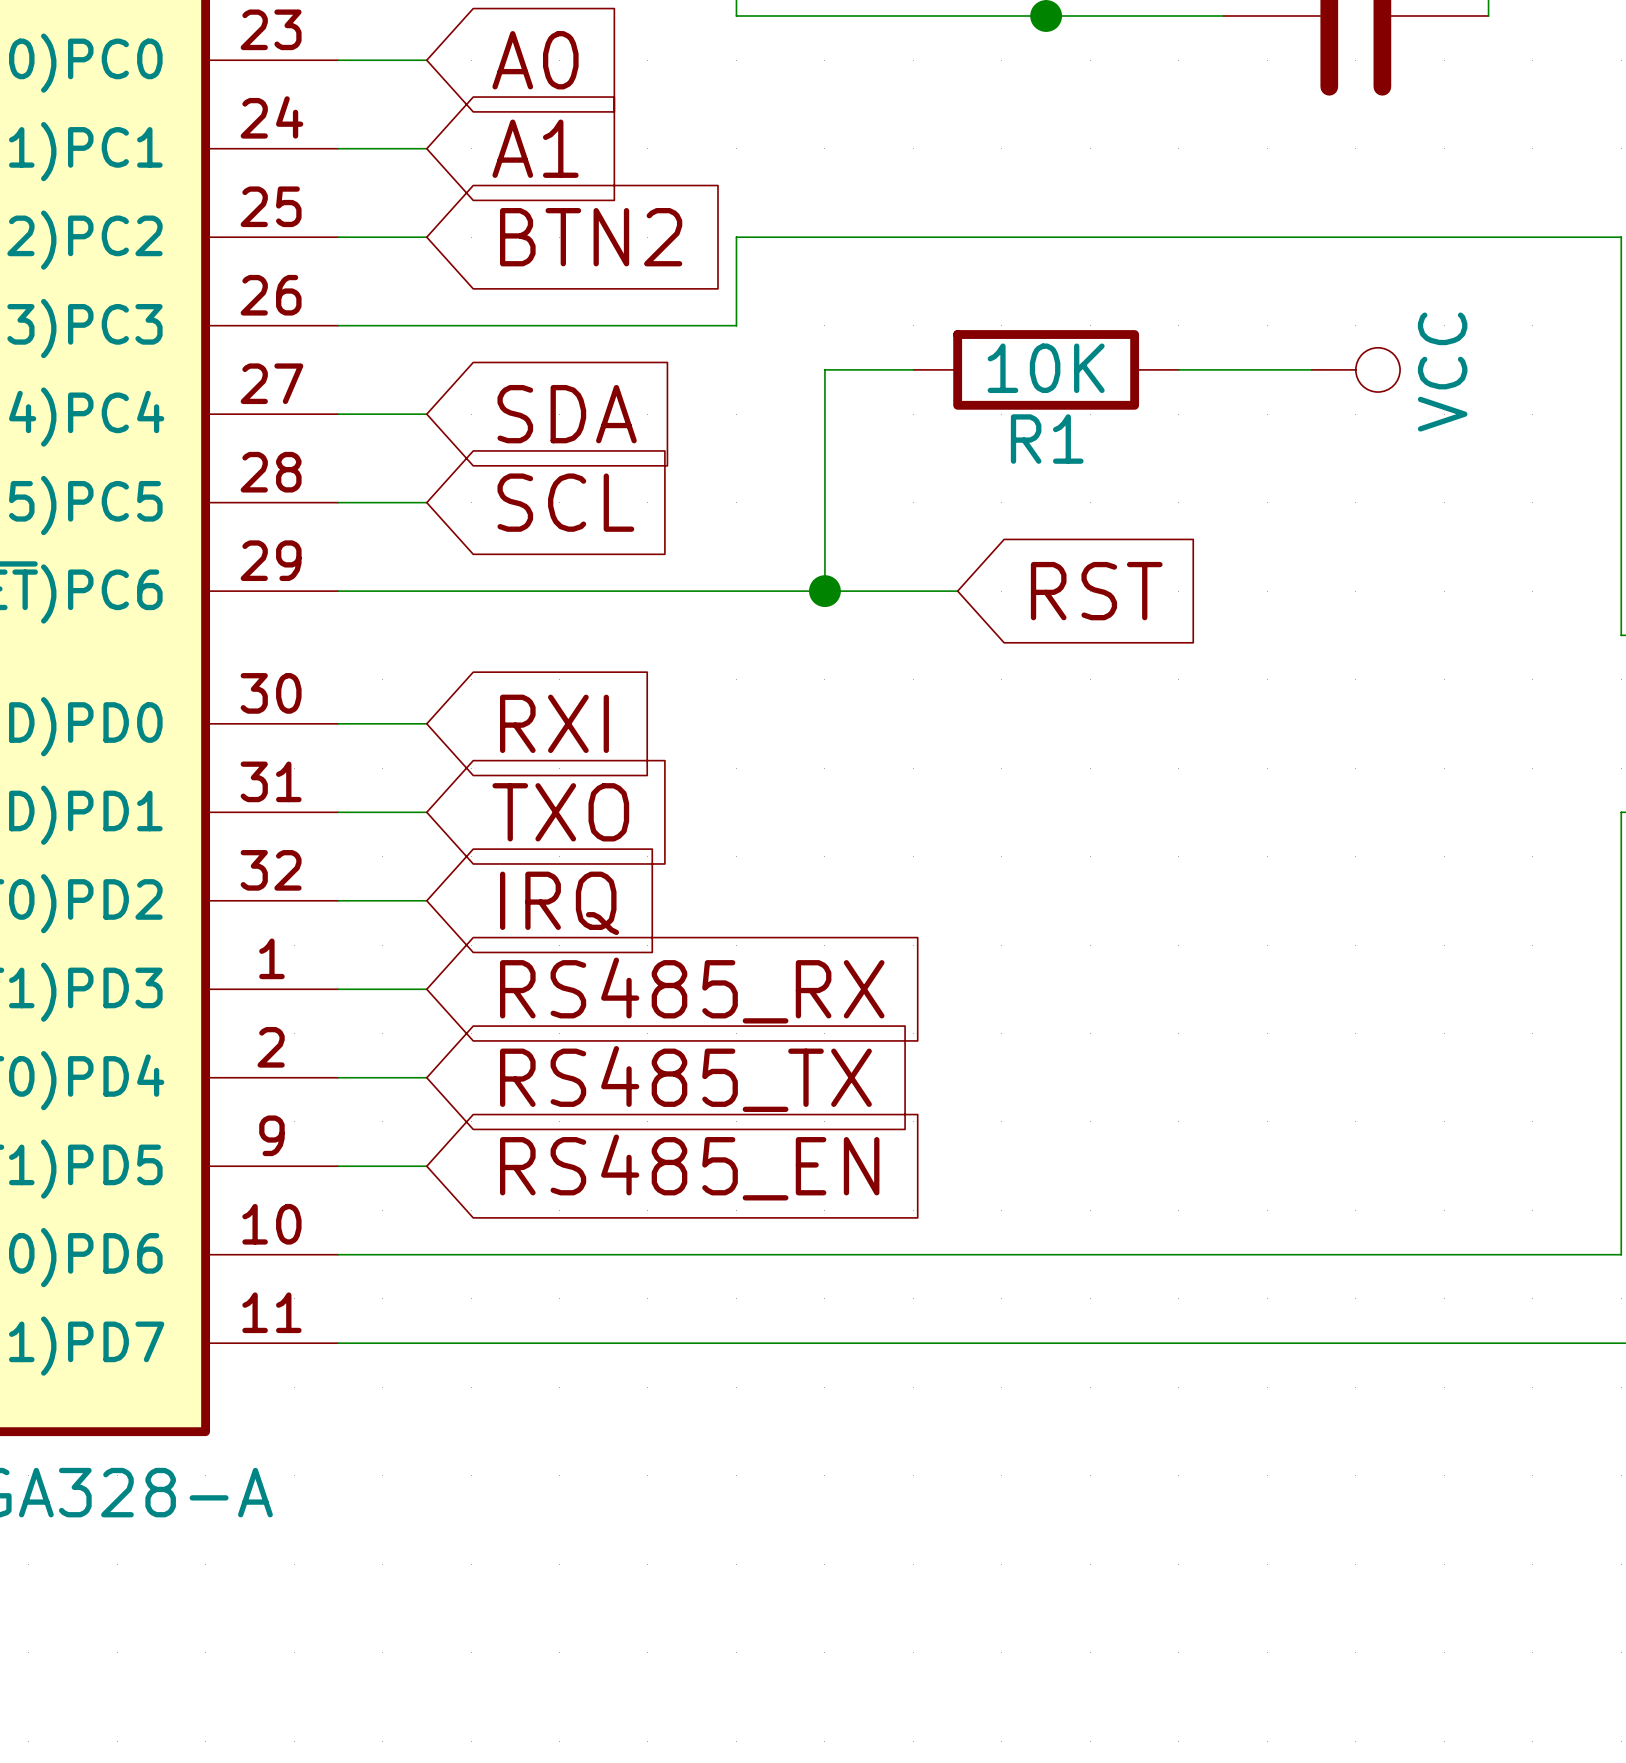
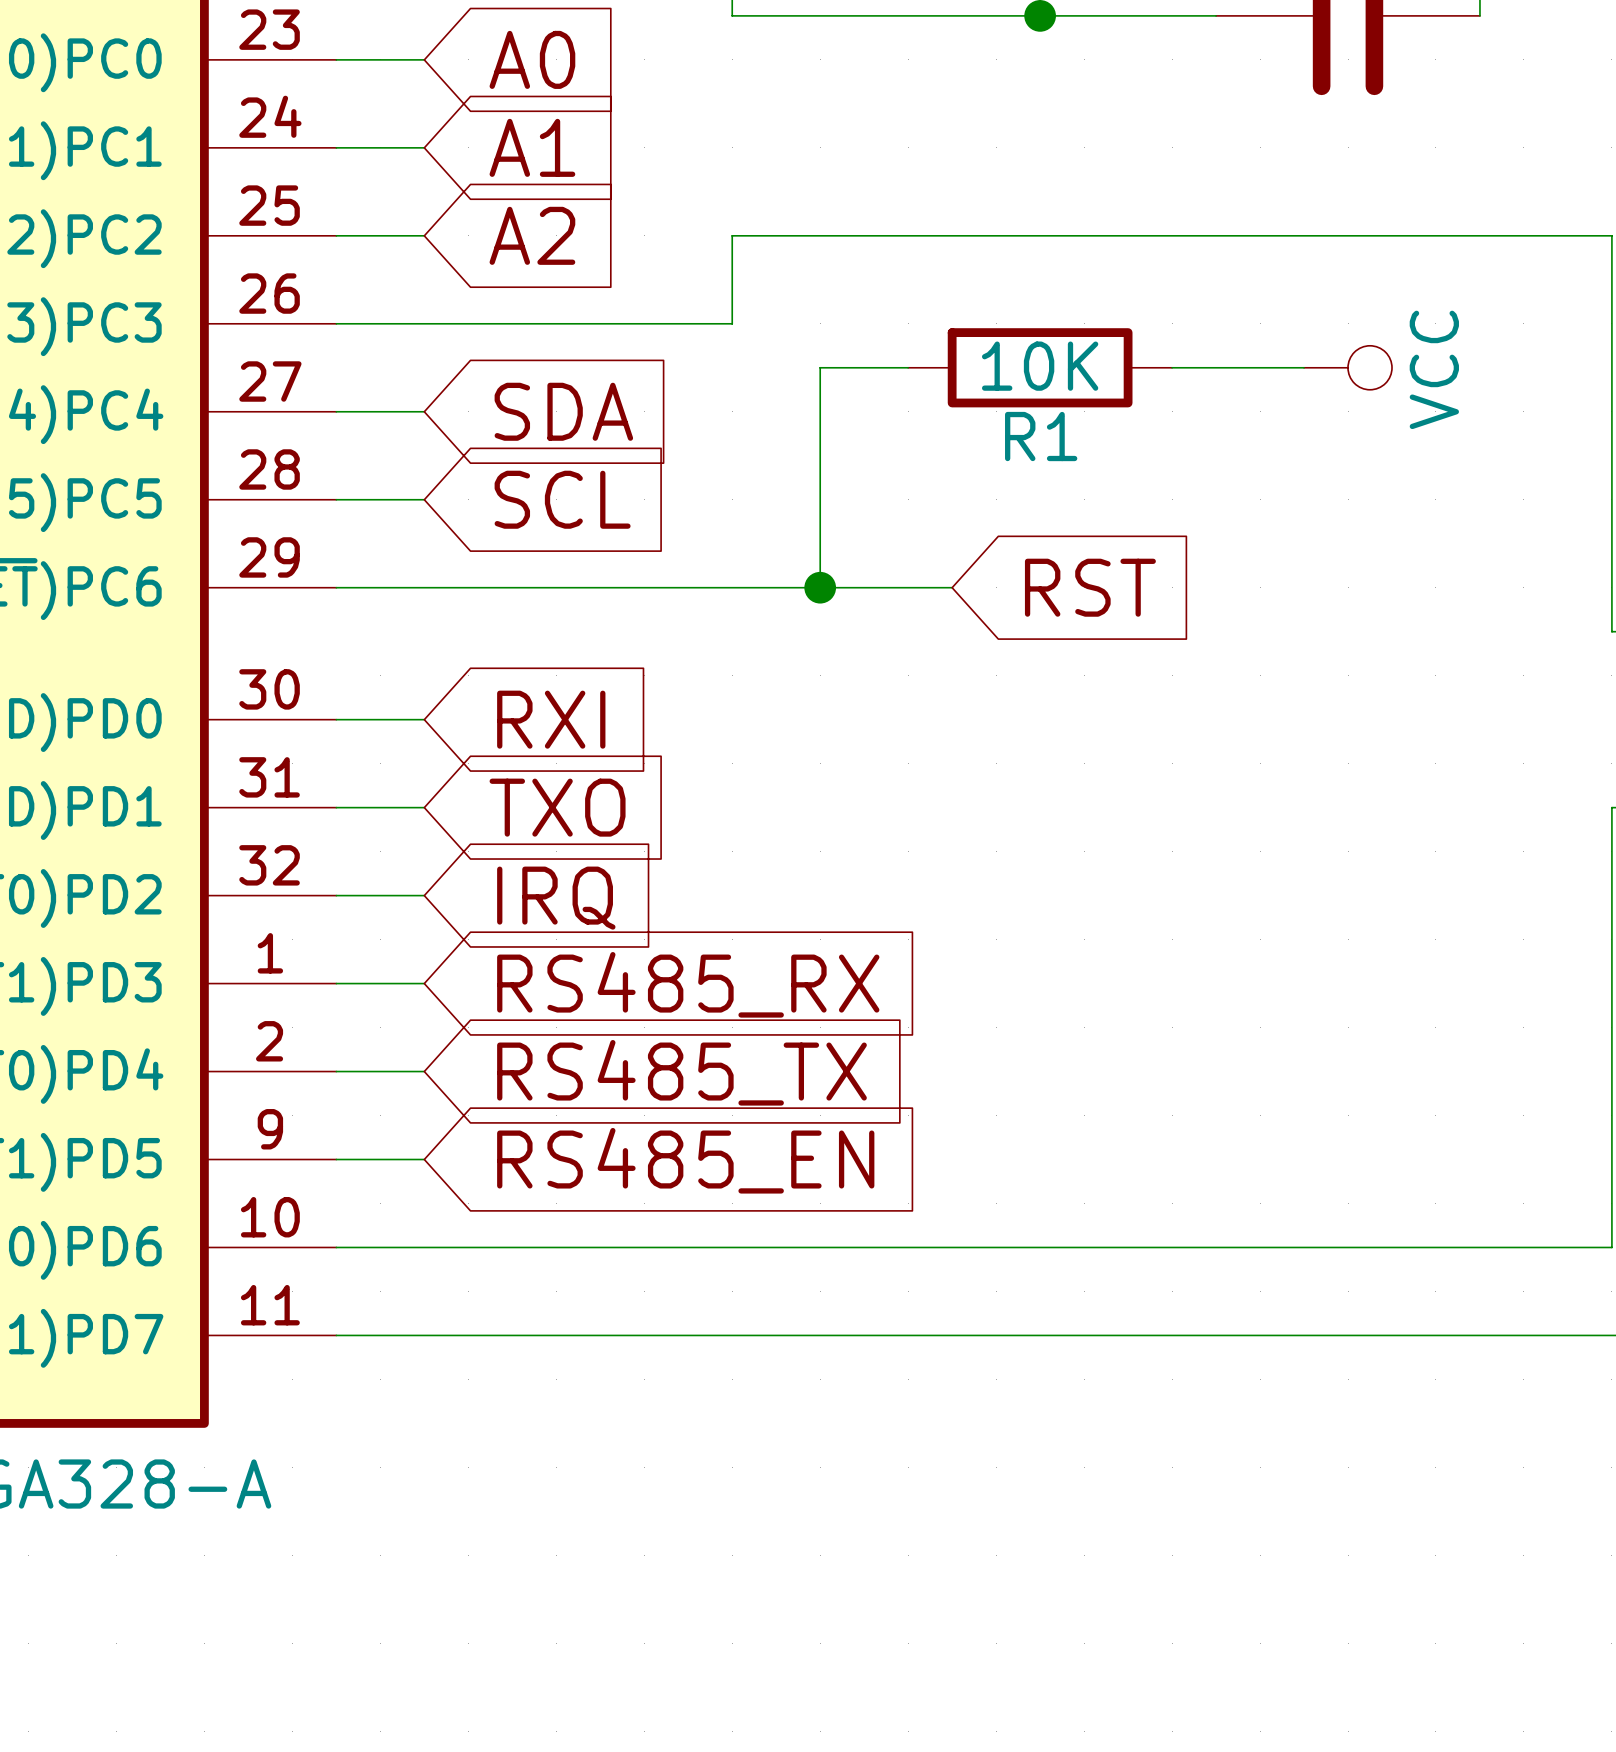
global label: BTN2 (591, 237) -> A2 (532, 235)

